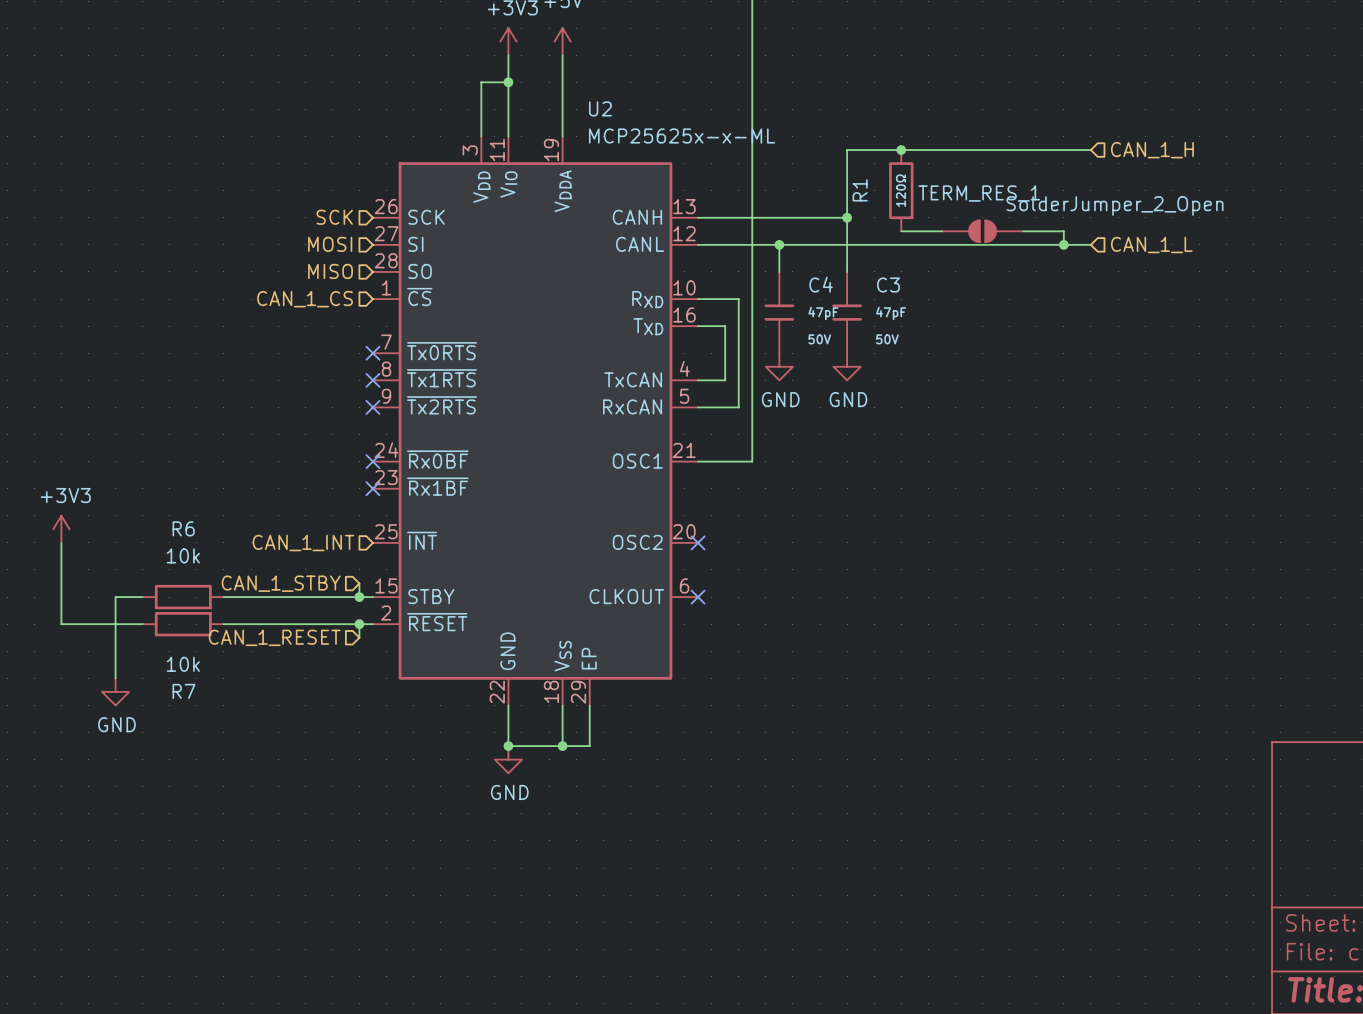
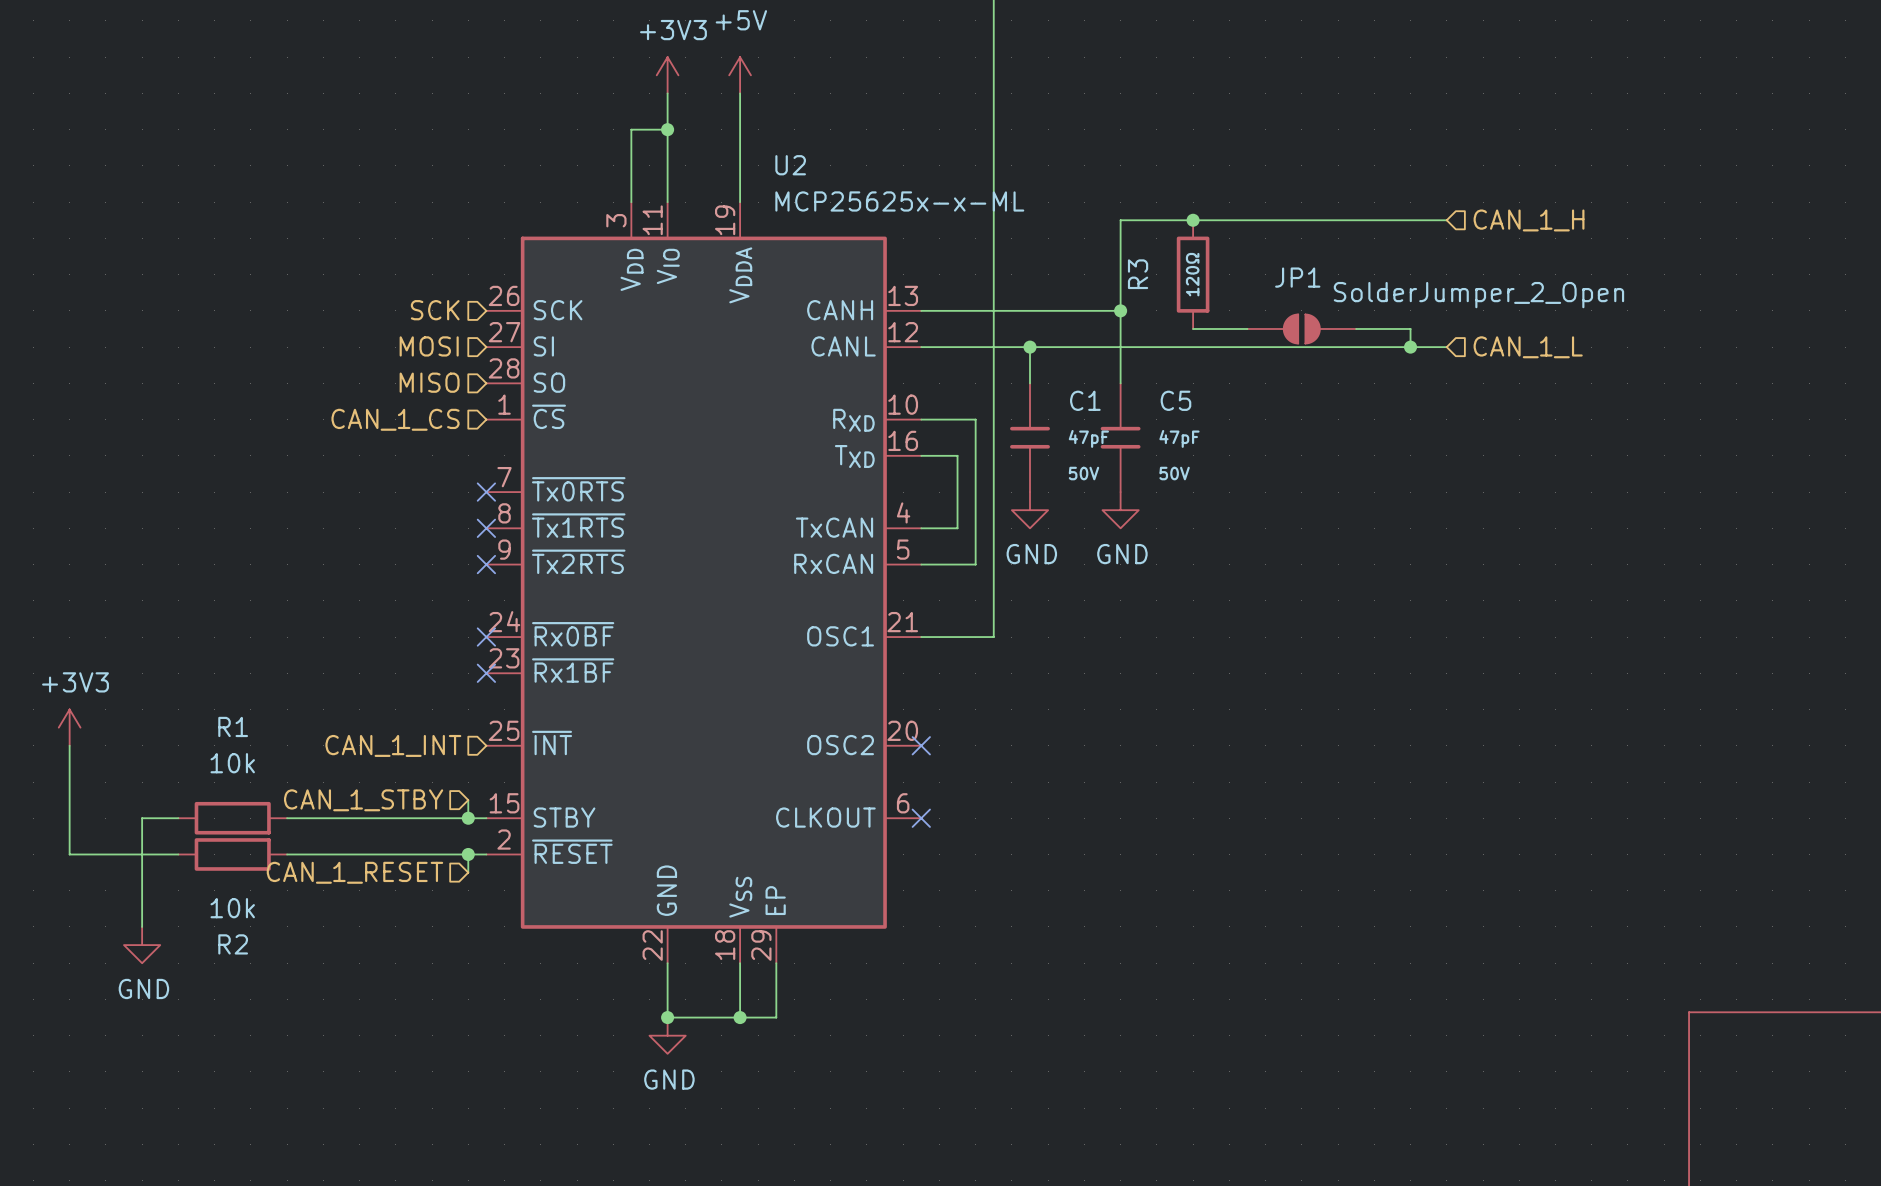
R1 name: R1 (860, 190) -> R3 (1138, 274)
TERM_RES_1 name: TERM_RES_1 (979, 193) -> JP1 (1297, 277)
C4 name: C4 (821, 284) -> C1 (1085, 400)
C3 name: C3 (888, 285) -> C5 (1175, 400)
R6 name: R6 (183, 528) -> R1 (233, 726)
R7 name: R7 (183, 691) -> R2 (233, 944)

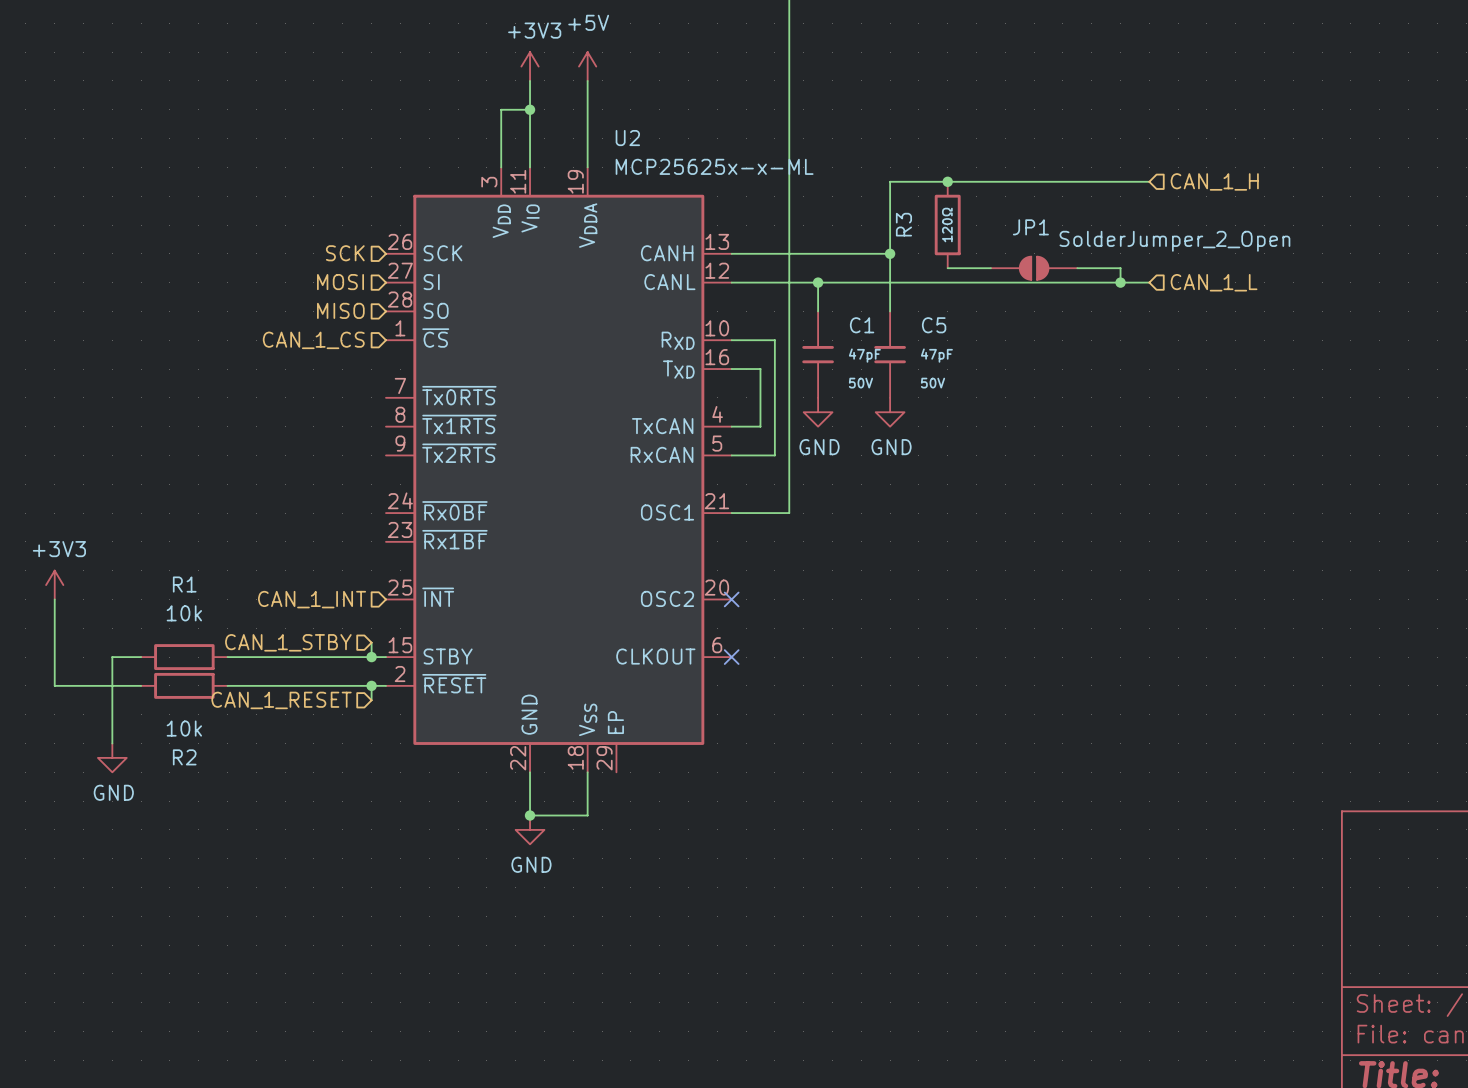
no-connect mark: (486, 492) -> none
no-connect mark: (486, 528) -> none
no-connect mark: (486, 564) -> none
no-connect mark: (486, 637) -> none
no-connect mark: (486, 673) -> none
wire: (776, 963) (776, 1017) (740, 1017) -> none
junction: (740, 1017) -> none

